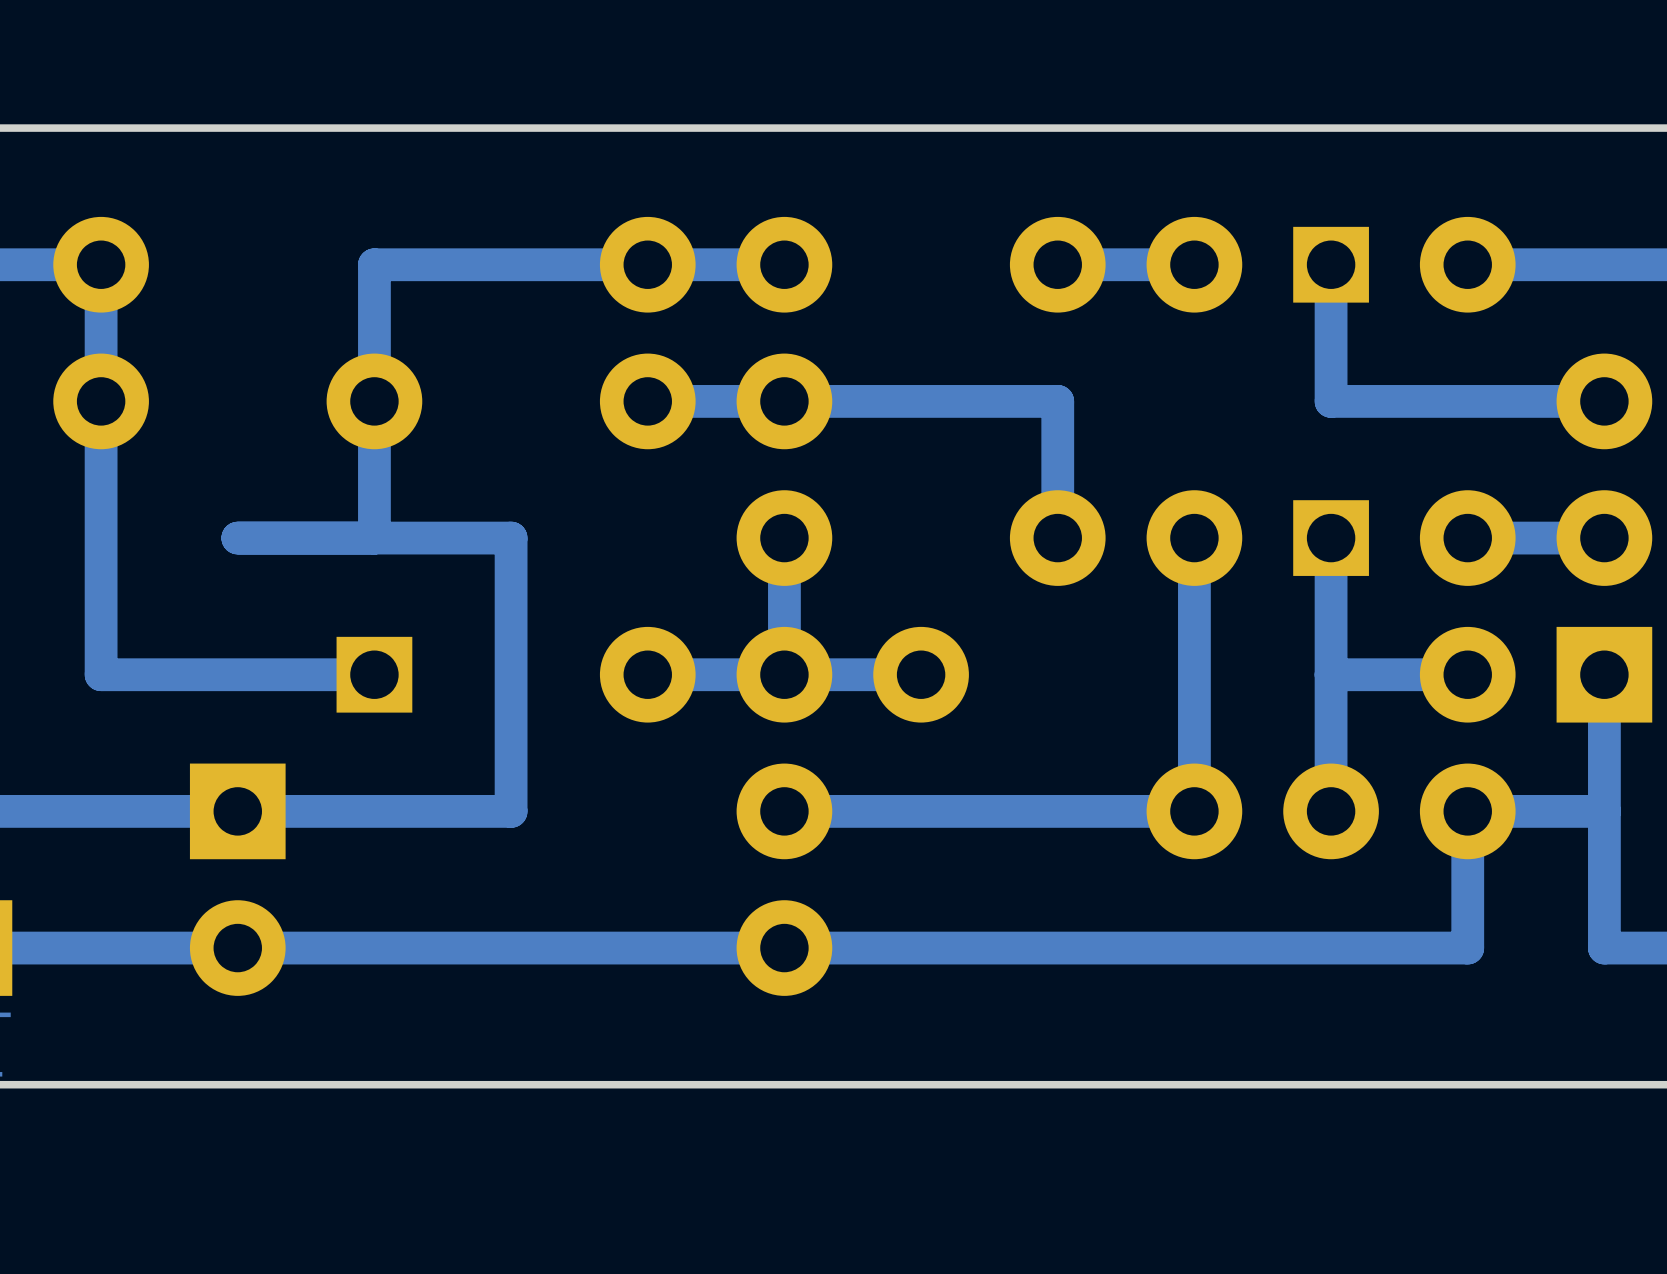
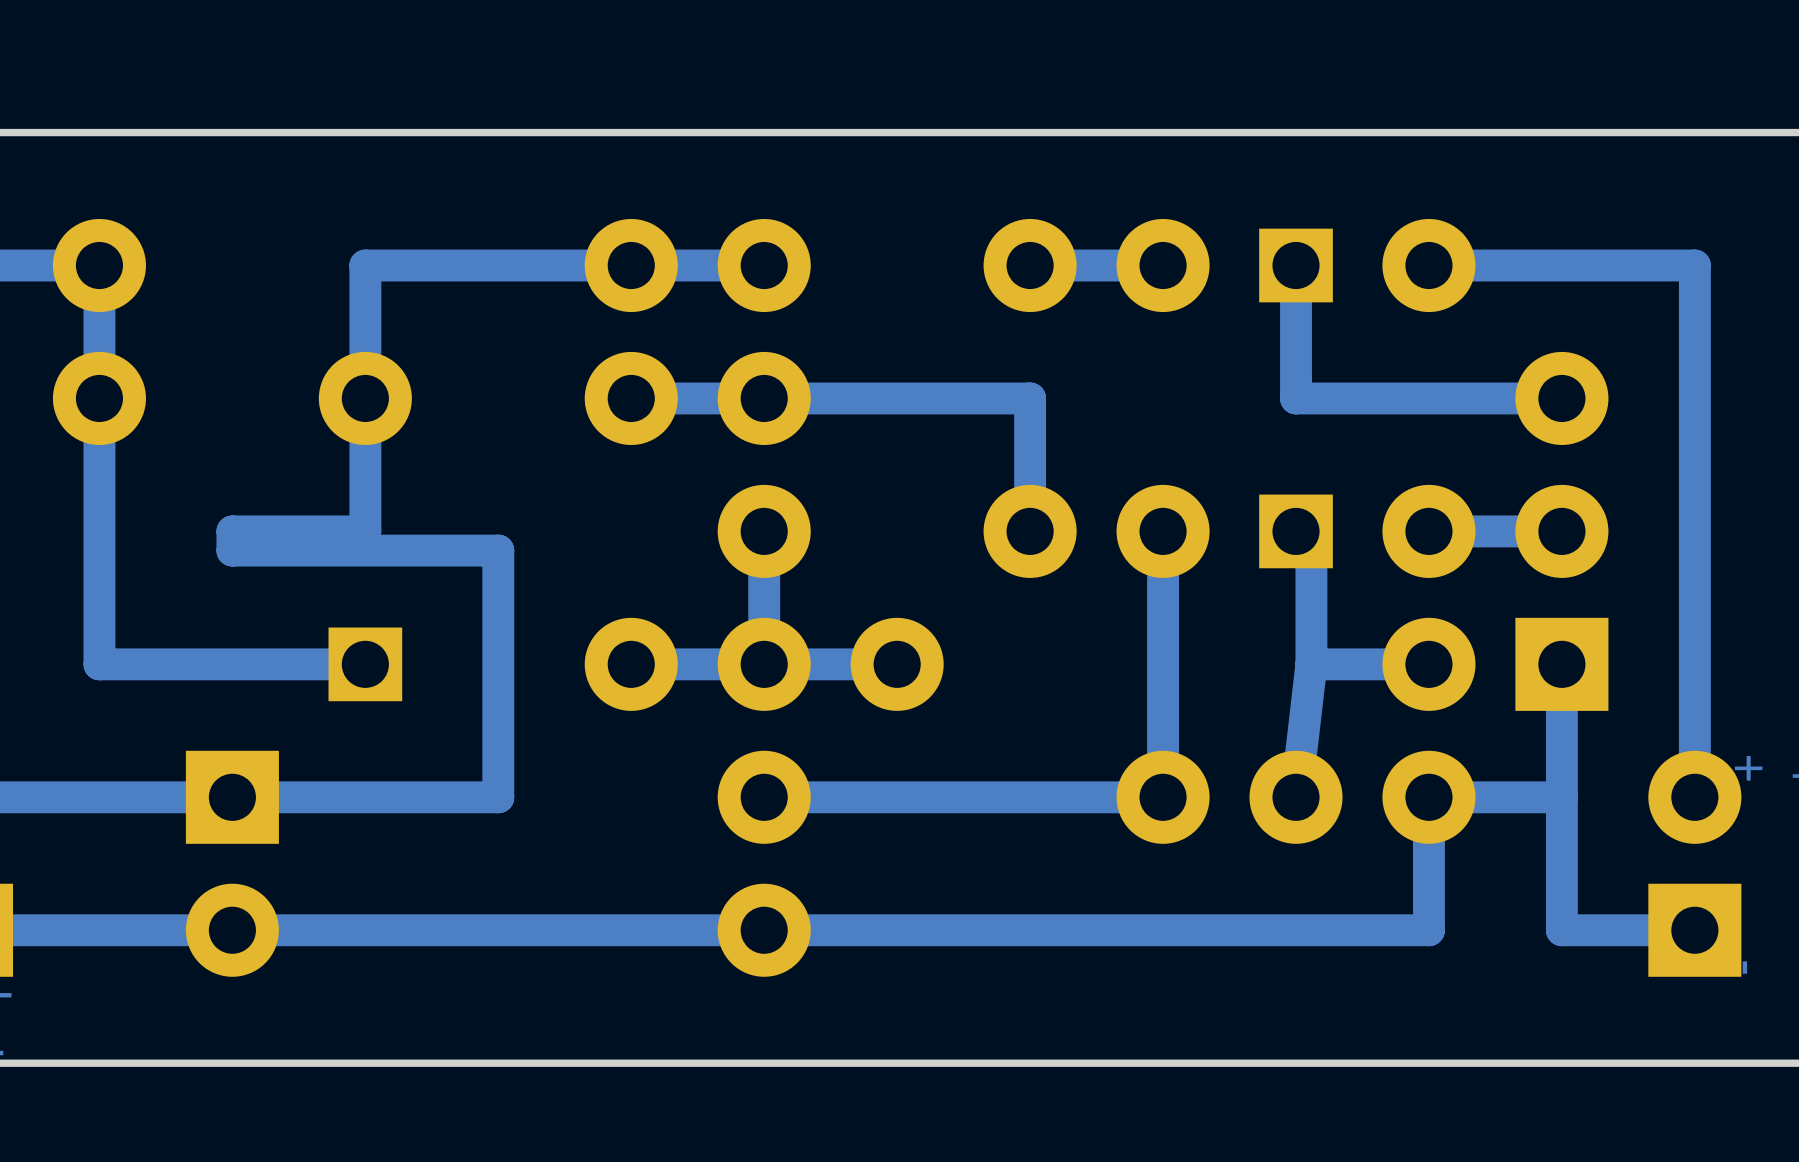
track: (374, 538) (511, 538) (511, 557) -> (232, 531) (232, 550) (498, 550)
track: (1331, 538) (1331, 811) -> (1296, 531) (1311, 546) (1311, 664) (1296, 797)

